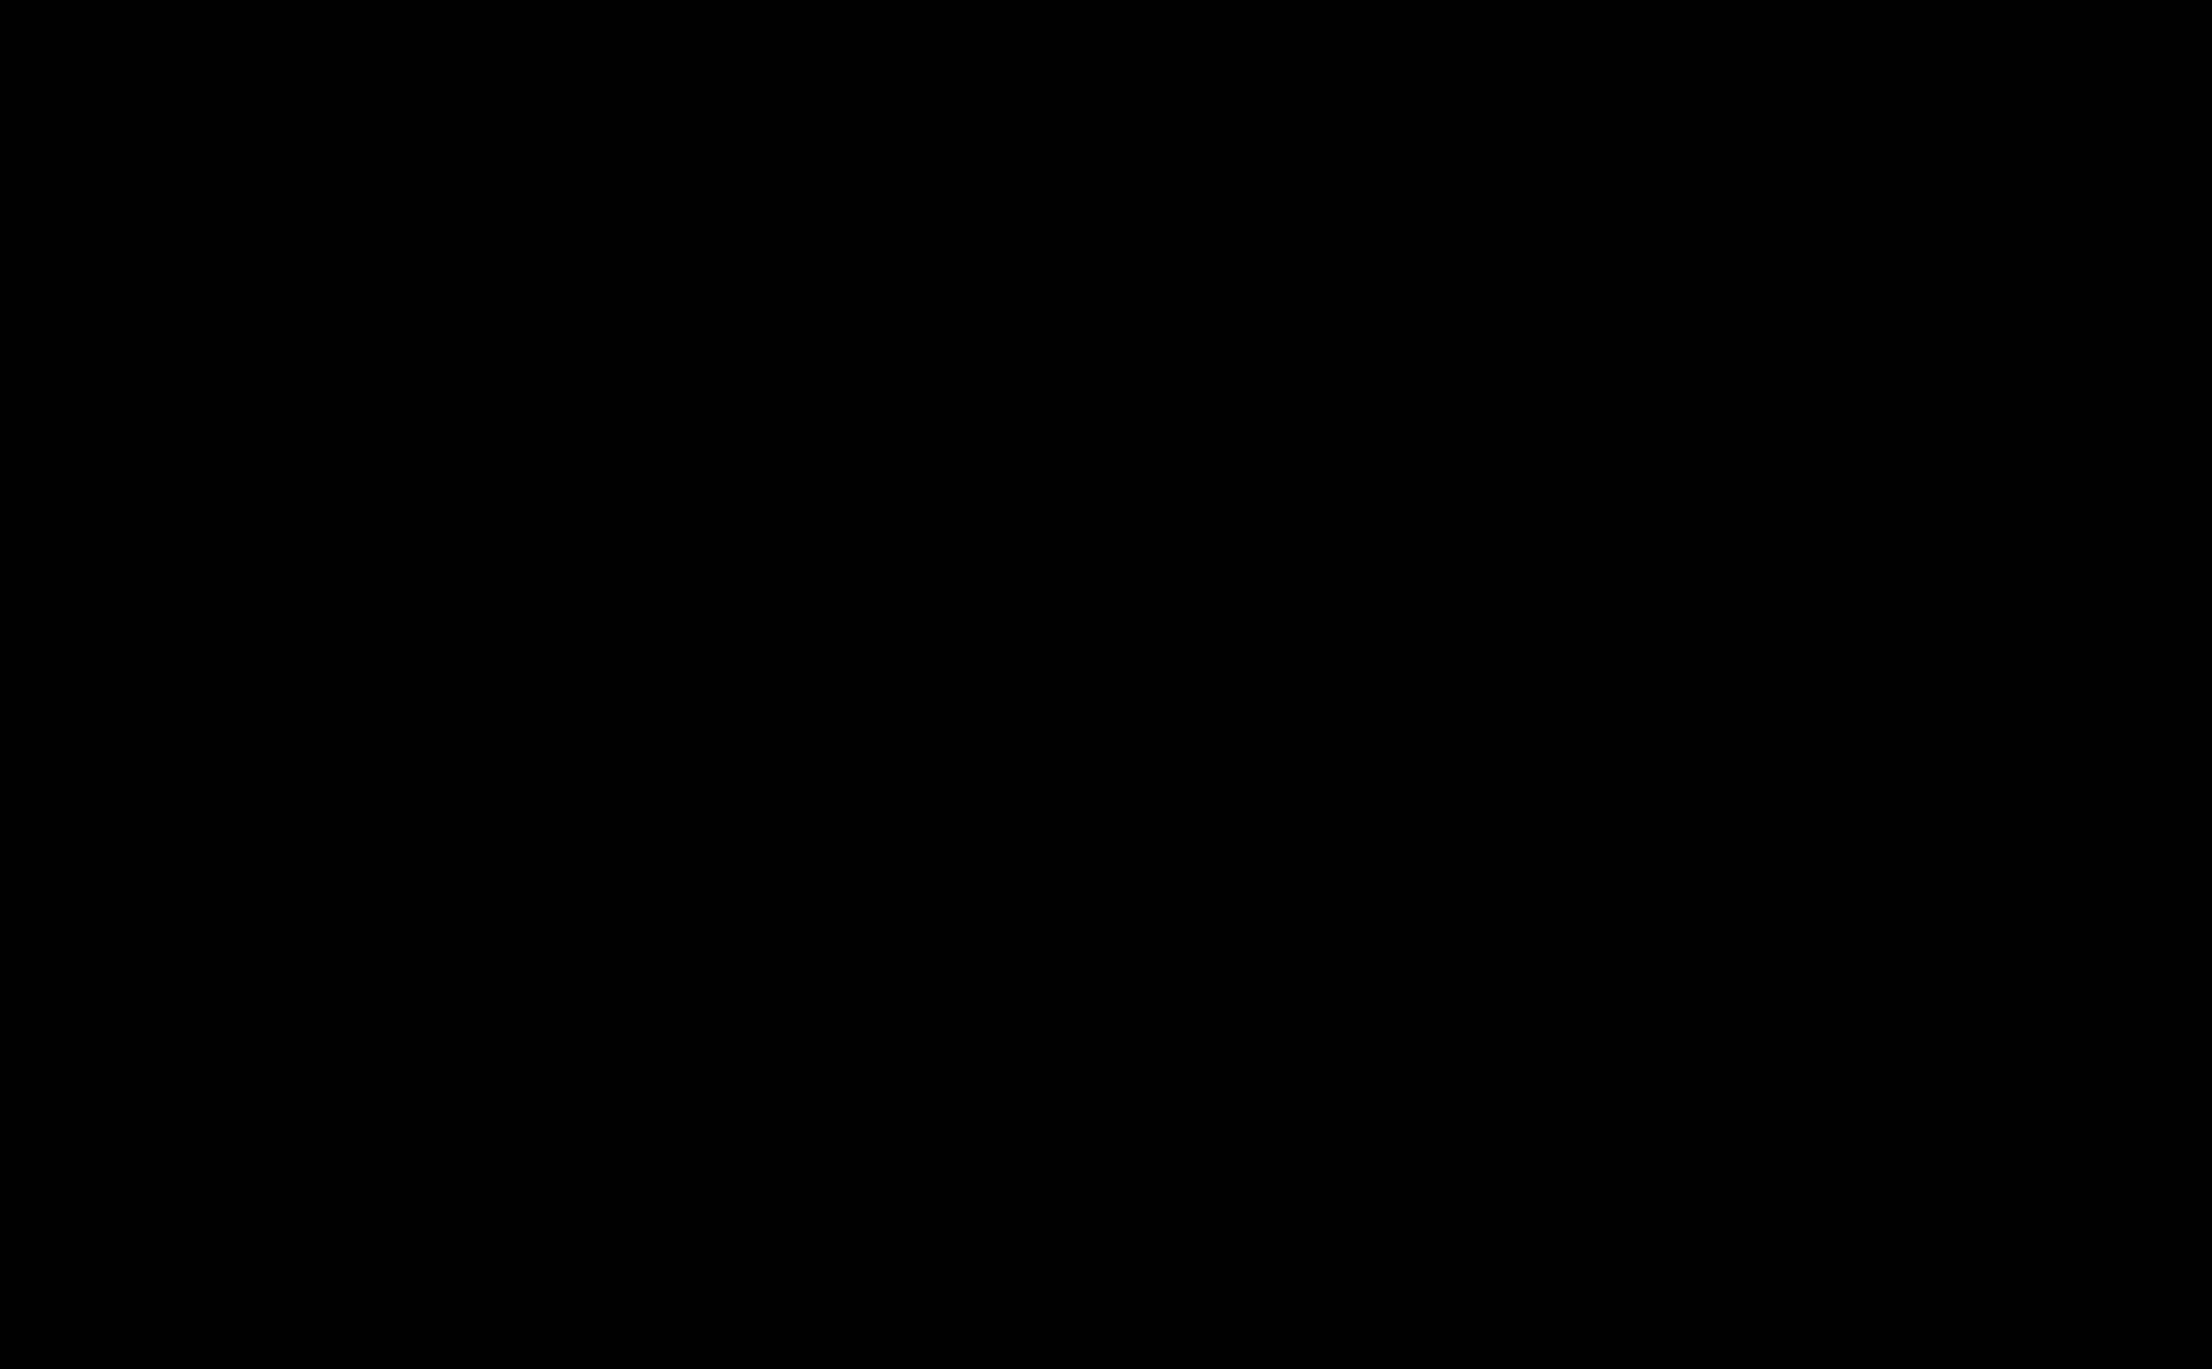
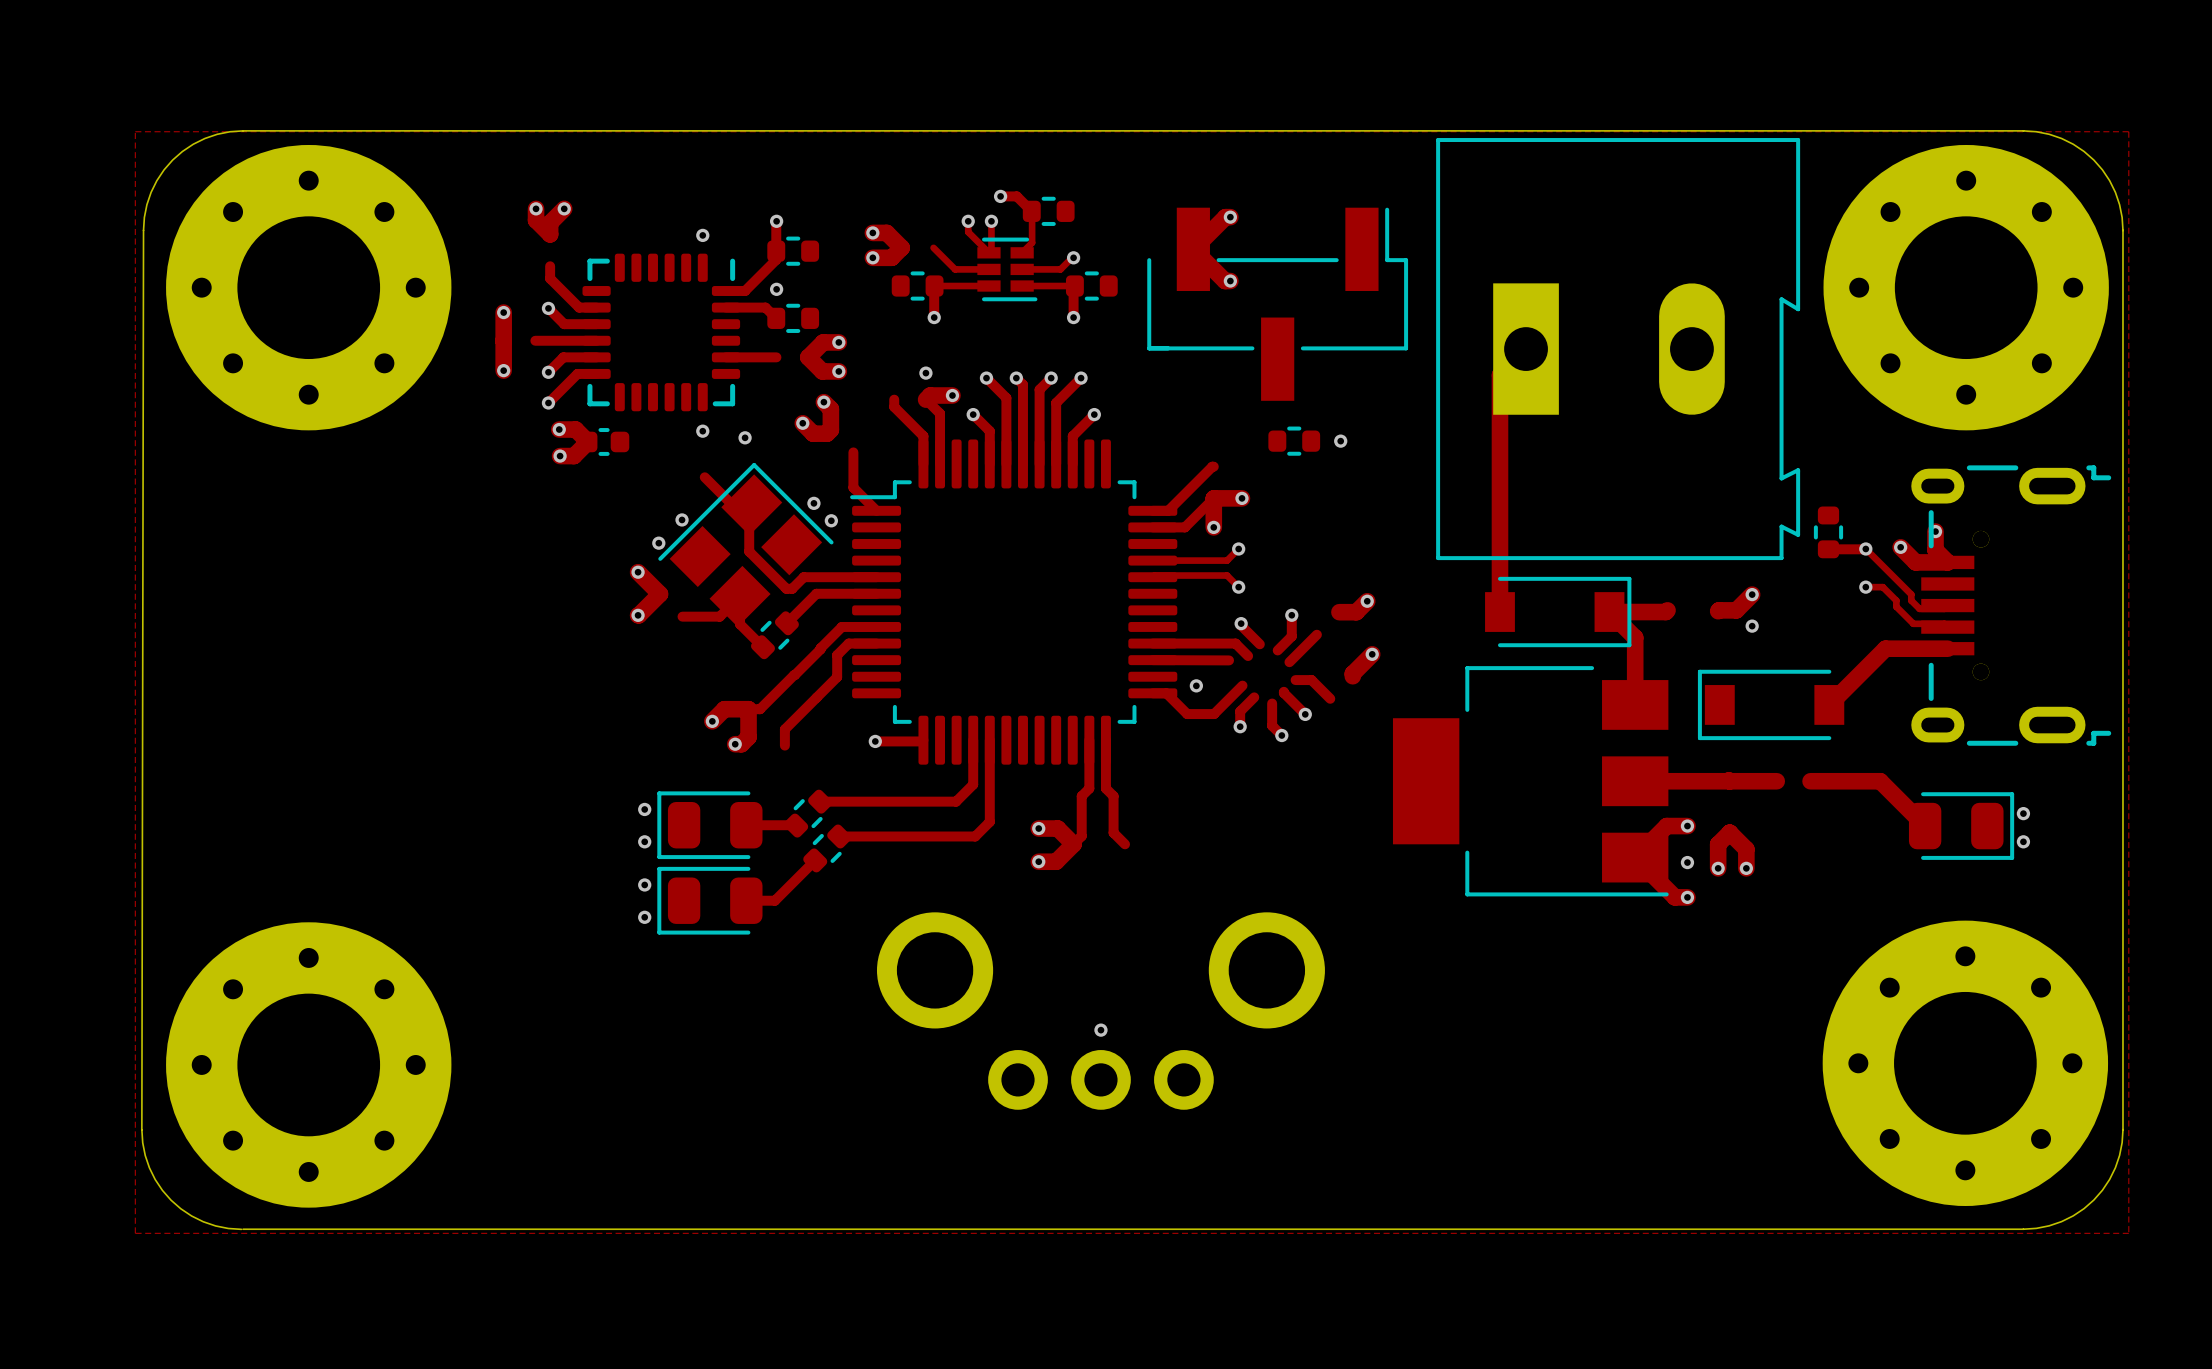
top zone outline: none -> (135, 131) (135, 1233) (2128, 1233) (2128, 131) (135, 131)
top track: none -> (1000, 196) (1016, 196) (1031, 211)
via: none -> (1000, 196)
top track: none -> (536, 208) (536, 220) (550, 234) (550, 222) (564, 208)
via: none -> (536, 208)
via: none -> (564, 208)
top track: none -> (1032, 211) (1032, 242) (1022, 252)
part: none -> (1048, 211)
top track: none -> (1230, 217) (1225, 217) (1193, 249) (1225, 281) (1230, 281)
via: none -> (1230, 217)
top track: none -> (776, 221) (776, 259) (745, 290) (726, 290)
via: none -> (776, 221)
top track: none -> (968, 221) (968, 232) (988, 252) (991, 250) (991, 221)
via: none -> (968, 221)
via: none -> (991, 221)
top track: none -> (872, 232) (886, 232) (901, 247) (891, 257) (872, 257)
via: none -> (872, 232)
via: none -> (702, 235)
top track: none -> (933, 247) (955, 269) (988, 269)
part: none -> (793, 251)
via: none -> (872, 257)
top track: none -> (1073, 257) (1060, 269) (1022, 269)
via: none -> (1073, 257)
top track: none -> (550, 266) (550, 278) (579, 307) (596, 307)
part: none -> (1007, 269)
via: none -> (1230, 281)
part: none -> (917, 286)
top track: none -> (934, 286) (988, 286)
top track: none -> (934, 286) (934, 317)
top track: none -> (1022, 286) (1074, 286) (1073, 317)
part: none -> (1091, 286)
part: none -> (308, 287)
part: none -> (1966, 287)
via: none -> (776, 289)
part: none -> (1277, 304)
top track: none -> (726, 307) (765, 307) (776, 318)
top track: none -> (548, 308) (564, 324) (596, 324)
via: none -> (548, 308)
top track: none -> (503, 312) (503, 340)
via: none -> (503, 312)
via: none -> (934, 317)
via: none -> (1073, 317)
part: none -> (793, 318)
part: none -> (661, 332)
top track: none -> (503, 340) (503, 370)
top track: none -> (535, 340) (596, 340)
top track: none -> (838, 342) (823, 342) (808, 357) (822, 371) (838, 371)
via: none -> (838, 342)
top track: none -> (1526, 349) (1499, 375) (1499, 612)
part: none -> (1618, 349)
top track: none -> (596, 357) (563, 357) (548, 372)
top track: none -> (726, 357) (776, 357)
via: none -> (503, 370)
via: none -> (838, 371)
via: none -> (548, 372)
top track: none -> (596, 373) (577, 373) (548, 402)
via: none -> (925, 373)
top track: none -> (986, 378) (1006, 398) (1006, 463)
via: none -> (986, 378)
top track: none -> (1016, 378) (1022, 384) (1022, 463)
via: none -> (1016, 378)
top track: none -> (1051, 378) (1039, 389) (1039, 463)
via: none -> (1051, 378)
top track: none -> (1081, 378) (1056, 402) (1056, 463)
via: none -> (1081, 378)
top track: none -> (952, 395) (930, 395) (926, 399) (940, 413) (940, 463)
via: none -> (952, 395)
top track: none -> (894, 399) (894, 406) (923, 436) (923, 463)
via: none -> (548, 402)
top track: none -> (823, 402) (830, 409) (830, 429) (827, 433) (813, 433) (802, 423)
via: none -> (823, 402)
top track: none -> (973, 414) (989, 431) (989, 463)
via: none -> (973, 414)
top track: none -> (1094, 414) (1072, 436) (1072, 463)
via: none -> (1094, 414)
via: none -> (802, 423)
top track: none -> (559, 429) (575, 429) (588, 441) (574, 456) (560, 456)
via: none -> (559, 429)
via: none -> (702, 431)
via: none -> (745, 437)
part: none -> (604, 441)
part: none -> (1294, 441)
via: none -> (1340, 441)
top track: none -> (853, 452) (853, 487) (876, 510)
via: none -> (560, 456)
top track: none -> (1213, 466) (1168, 510) (1152, 510)
top track: none -> (704, 477) (732, 504) (751, 504) (749, 507) (749, 551) (786, 588) (792, 588) (803, 577) (876, 577)
top track: none -> (1213, 498) (1241, 498)
via: none -> (1241, 498)
via: none -> (813, 503)
via: none -> (682, 519)
via: none -> (831, 520)
top track: none -> (1152, 527) (1184, 527) (1213, 498) (1213, 527)
via: none -> (1213, 527)
top track: none -> (1935, 531) (1935, 550) (1947, 562) (1915, 562) (1900, 547)
via: none -> (1935, 531)
part: none -> (1828, 532)
via: none -> (658, 543)
part: none -> (745, 544)
via: none -> (1900, 547)
top track: none -> (1238, 548) (1227, 560) (1152, 560)
via: none -> (1238, 548)
top track: none -> (1865, 548) (1911, 594) (1911, 600) (1919, 608) (1944, 608) (1947, 605)
via: none -> (1865, 548)
top track: none -> (1828, 549) (1865, 549)
top track: none -> (638, 572) (659, 594) (638, 615)
via: none -> (638, 572)
top track: none -> (1152, 577) (1154, 575) (1227, 575) (1238, 587)
via: none -> (1238, 587)
top track: none -> (1865, 587) (1882, 587) (1896, 600) (1896, 606) (1913, 623) (1944, 623) (1947, 627)
via: none -> (1865, 587)
top track: none -> (876, 593) (816, 593) (786, 623)
top track: none -> (1752, 594) (1736, 610) (1718, 611)
via: none -> (1752, 594)
top track: none -> (1367, 601) (1356, 612) (1339, 612)
via: none -> (1367, 601)
part: none -> (1013, 602)
part: none -> (2011, 605)
top track: none -> (1667, 610) (1665, 612) (1609, 612) (1635, 637) (1635, 704)
part: none -> (1558, 612)
via: none -> (638, 615)
top track: none -> (1291, 615) (1291, 636) (1277, 650)
via: none -> (1291, 615)
top track: none -> (682, 616) (719, 616) (740, 596) (740, 624) (762, 647)
top track: none -> (1241, 623) (1259, 644)
via: none -> (1241, 623)
top track: none -> (876, 626) (841, 626) (760, 709) (748, 709)
via: none -> (1752, 626)
top track: none -> (1316, 634) (1289, 662)
part: none -> (774, 635)
top track: none -> (876, 643) (848, 643) (837, 655) (837, 677) (784, 729) (784, 745)
top track: none -> (1152, 643) (1235, 643) (1248, 656)
top track: none -> (1947, 648) (1885, 648) (1829, 704)
top track: none -> (1372, 654) (1352, 673) (1352, 676)
via: none -> (1372, 654)
top track: none -> (1152, 660) (1229, 660)
top track: none -> (1295, 680) (1311, 680) (1330, 698)
via: none -> (1196, 685)
top track: none -> (1242, 685) (1214, 714) (1187, 714) (1166, 693) (1152, 693)
top track: none -> (1283, 691) (1305, 714)
top track: none -> (1254, 697) (1240, 711) (1240, 726)
top track: none -> (1272, 703) (1272, 725) (1281, 735)
part: none -> (1771, 704)
top track: none -> (748, 709) (724, 709) (712, 721)
top track: none -> (748, 709) (748, 737) (741, 744) (735, 744)
via: none -> (1305, 714)
via: none -> (712, 721)
via: none -> (1240, 726)
via: none -> (1281, 735)
top track: none -> (923, 740) (875, 741)
top track: none -> (973, 740) (973, 784) (956, 801) (820, 801)
top track: none -> (989, 740) (989, 821) (975, 836) (839, 836)
top track: none -> (1089, 740) (1089, 788) (1081, 796) (1081, 836) (1073, 844)
top track: none -> (1105, 740) (1105, 788) (1113, 796) (1113, 832) (1125, 844)
via: none -> (875, 741)
via: none -> (735, 744)
part: none -> (1530, 781)
top track: none -> (1635, 781) (1776, 781)
top track: none -> (1810, 781) (1880, 781) (1926, 827)
via: none -> (644, 809)
part: none -> (808, 813)
via: none -> (2023, 813)
part: none -> (709, 825)
top track: none -> (746, 825) (795, 825)
top track: none -> (1687, 826) (1666, 826) (1635, 857) (1675, 897) (1687, 897)
via: none -> (1687, 826)
part: none -> (1961, 826)
top track: none -> (1038, 828) (1057, 828) (1073, 844)
via: none -> (1038, 828)
via: none -> (644, 841)
via: none -> (2023, 841)
top track: none -> (1073, 844) (1056, 861) (1038, 861)
part: none -> (827, 848)
top track: none -> (815, 860) (774, 900) (746, 900)
via: none -> (1038, 861)
via: none -> (1687, 862)
top track: none -> (1718, 868) (1718, 844) (1729, 832) (1746, 849) (1746, 868)
via: none -> (1718, 868)
via: none -> (1746, 868)
via: none -> (644, 884)
via: none -> (1687, 897)
part: none -> (709, 900)
via: none -> (644, 917)
part: none -> (1100, 1011)
via: none -> (1100, 1030)
part: none -> (1965, 1063)
part: none -> (308, 1064)
board edge: none -> (241, 1229) (228, 1228) (203, 1221) (180, 1208) (171, 1200) (155, 1179) (149, 1167) (142, 1142) (141, 1129) (143, 230) (146, 204) (156, 180) (172, 160) (193, 144) (217, 134) (243, 130) (2023, 130) (2049, 134) (2073, 144) (2093, 160) (2109, 180) (2119, 204) (2122, 230) (2122, 1129) (2119, 1155) (2109, 1179) (2093, 1200) (2073, 1215) (2049, 1225) (2023, 1229) (243, 1229)

